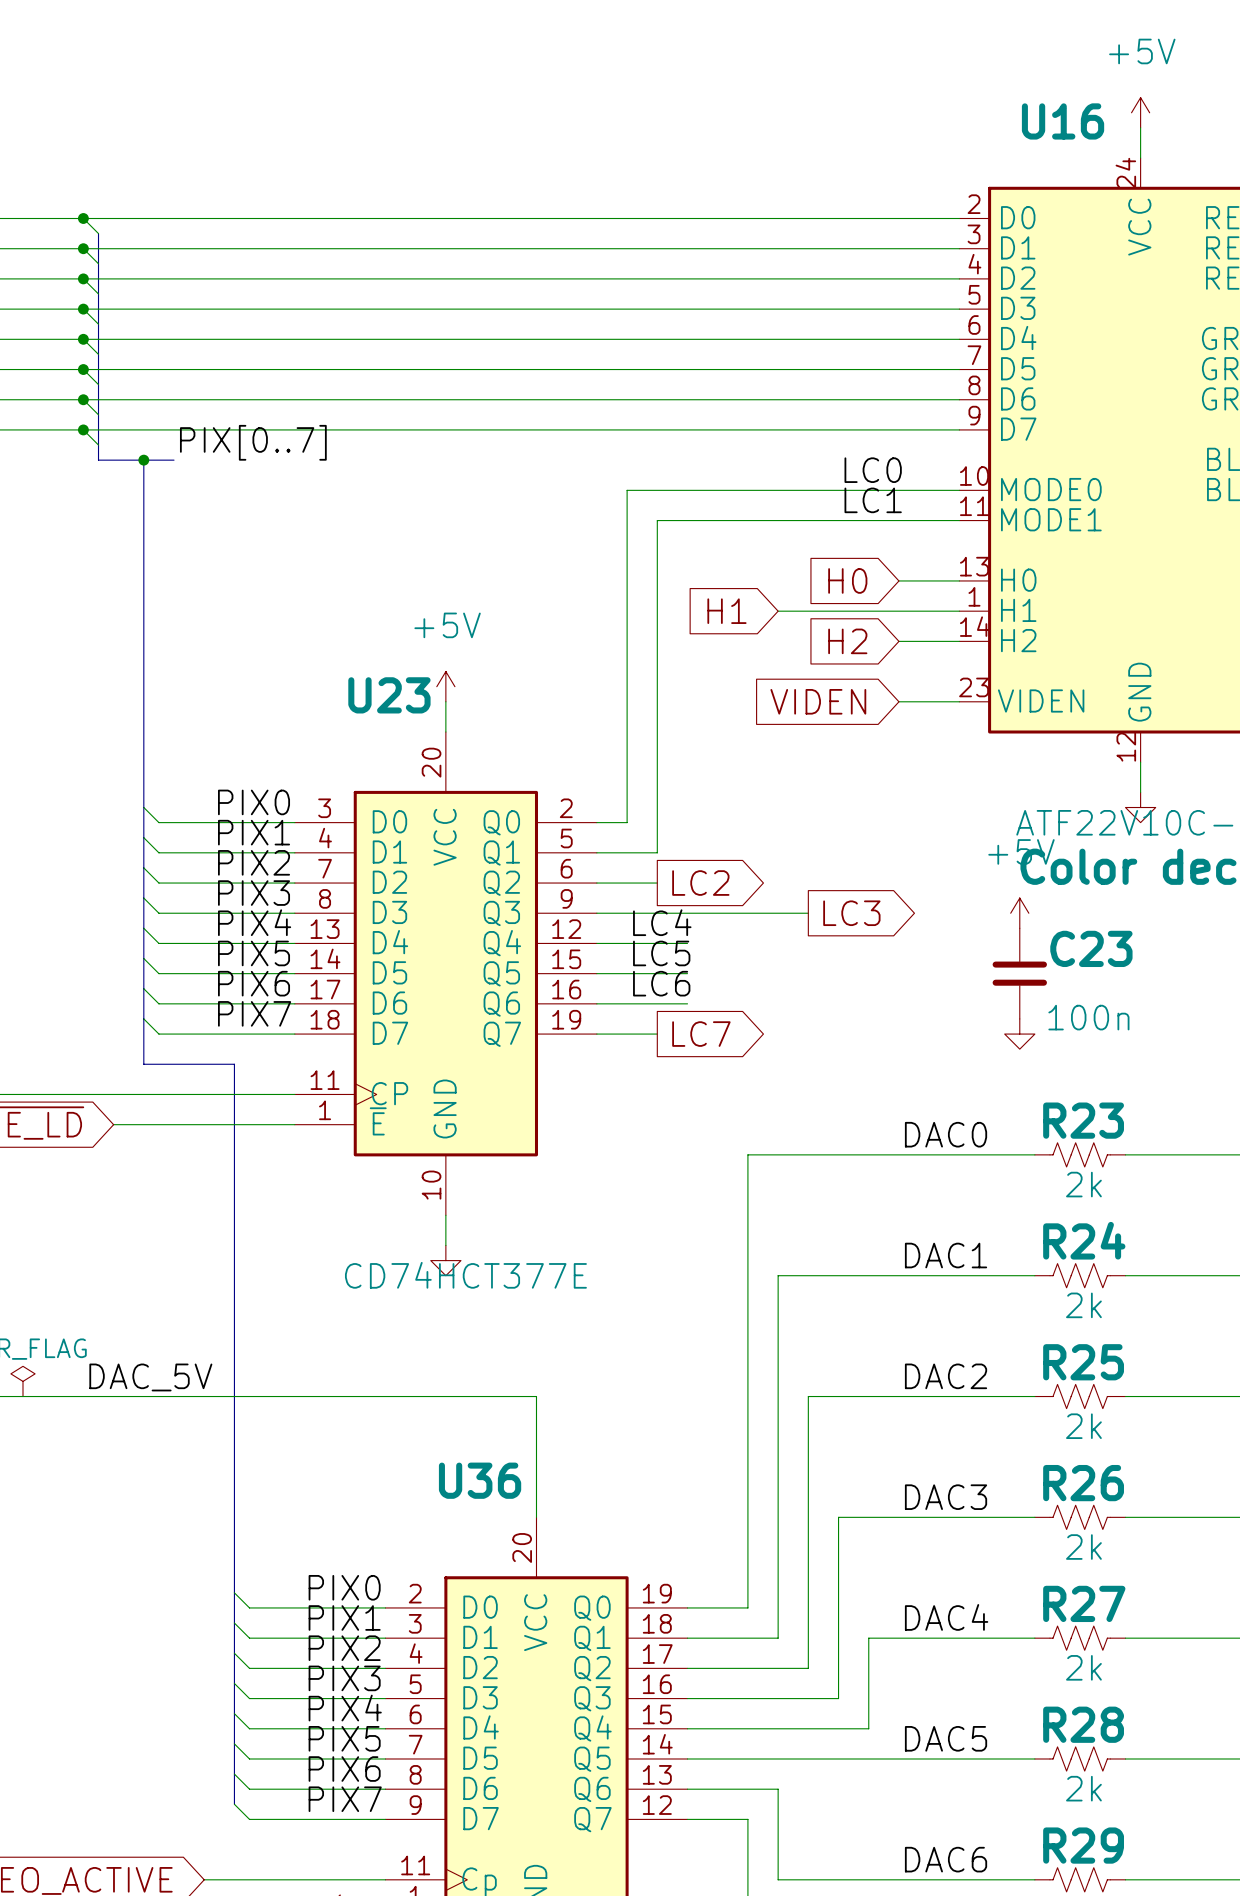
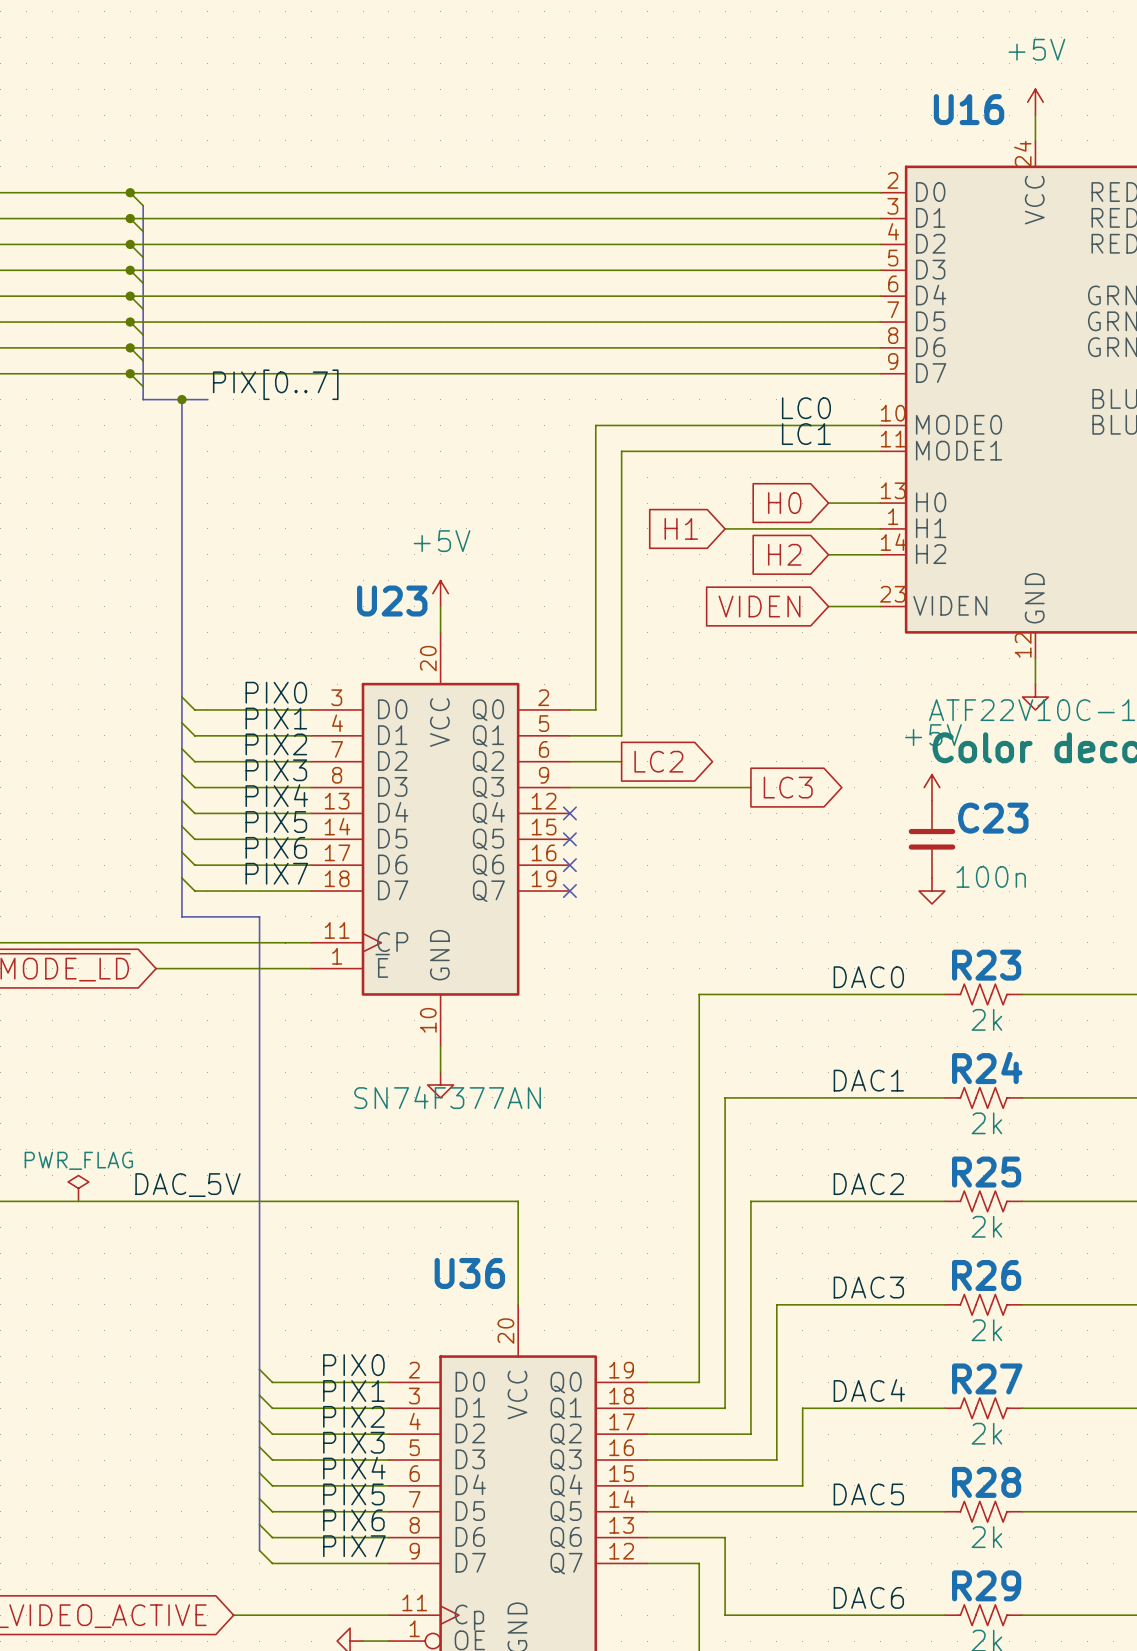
label: LC4 (662, 922) -> none
wire: (596, 943) (687, 943) -> none
no-connect mark: none -> (569, 813)
label: LC5 (661, 953) -> none
wire: (596, 973) (687, 973) -> none
no-connect mark: none -> (569, 839)
label: LC6 (661, 983) -> none
wire: (596, 1003) (687, 1003) -> none
no-connect mark: none -> (569, 865)
wire: (596, 1034) (657, 1034) -> none
no-connect mark: none -> (569, 891)
global label: LC7 (701, 1034) -> none
U23 value: CD74HCT377E (465, 1275) -> SN74F377AN (447, 1097)

